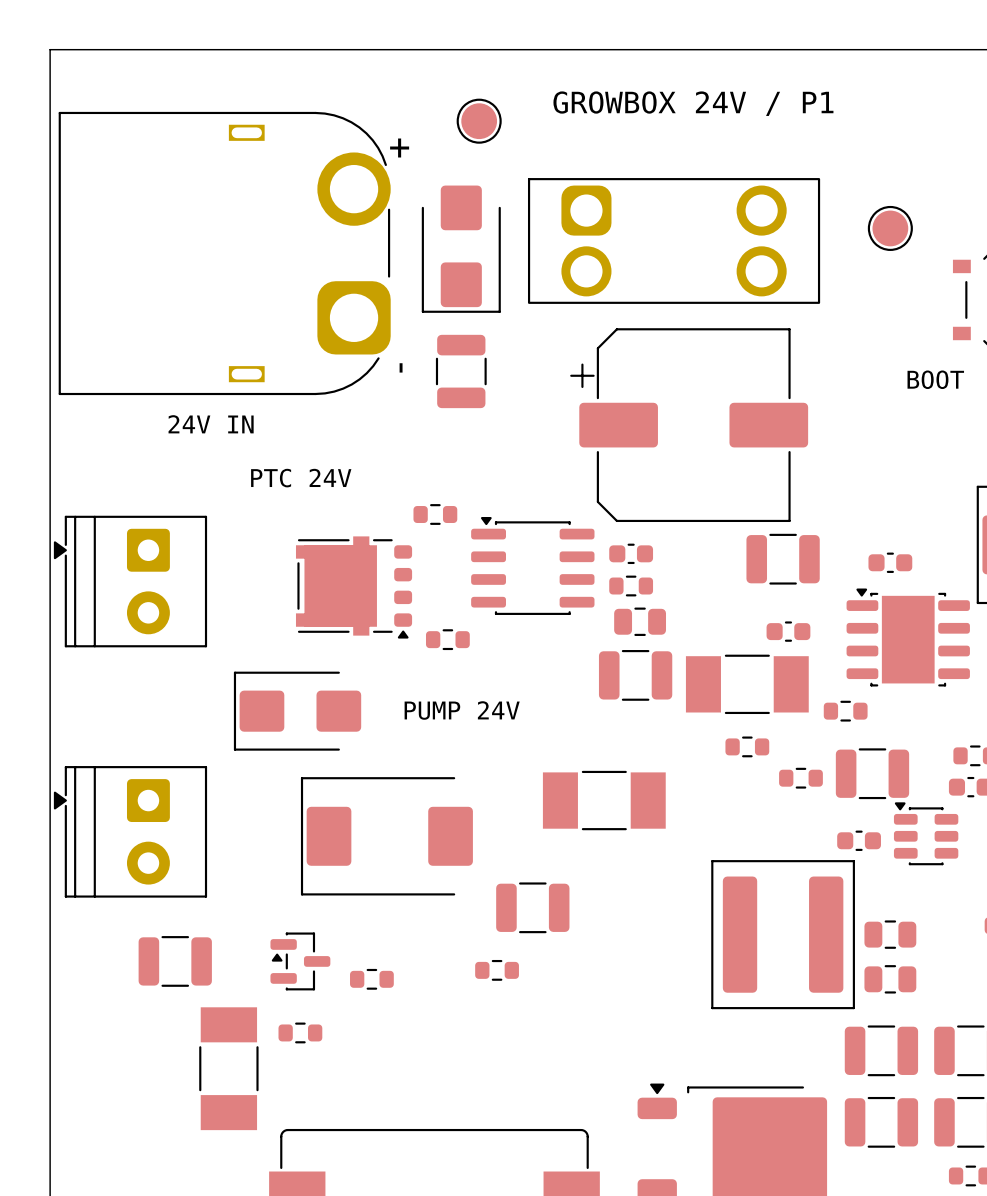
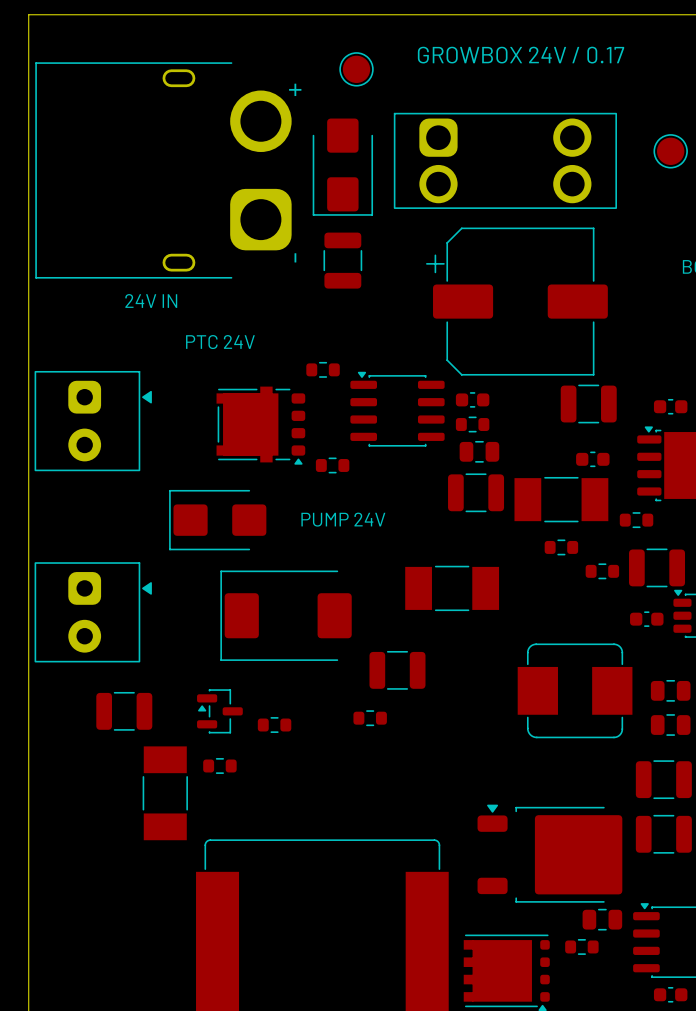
text: GROWBOX 24V / P1 (693, 103) -> GROWBOX 24V / 0.17 (521, 55)
part footprint: [58, 111, 391, 396] -> [35, 62, 292, 279]
part footprint: [53, 515, 208, 648] -> [34, 370, 152, 472]
part footprint: [53, 766, 208, 898] -> [34, 562, 152, 663]
part footprint: [711, 860, 855, 1010] -> [517, 643, 633, 739]

